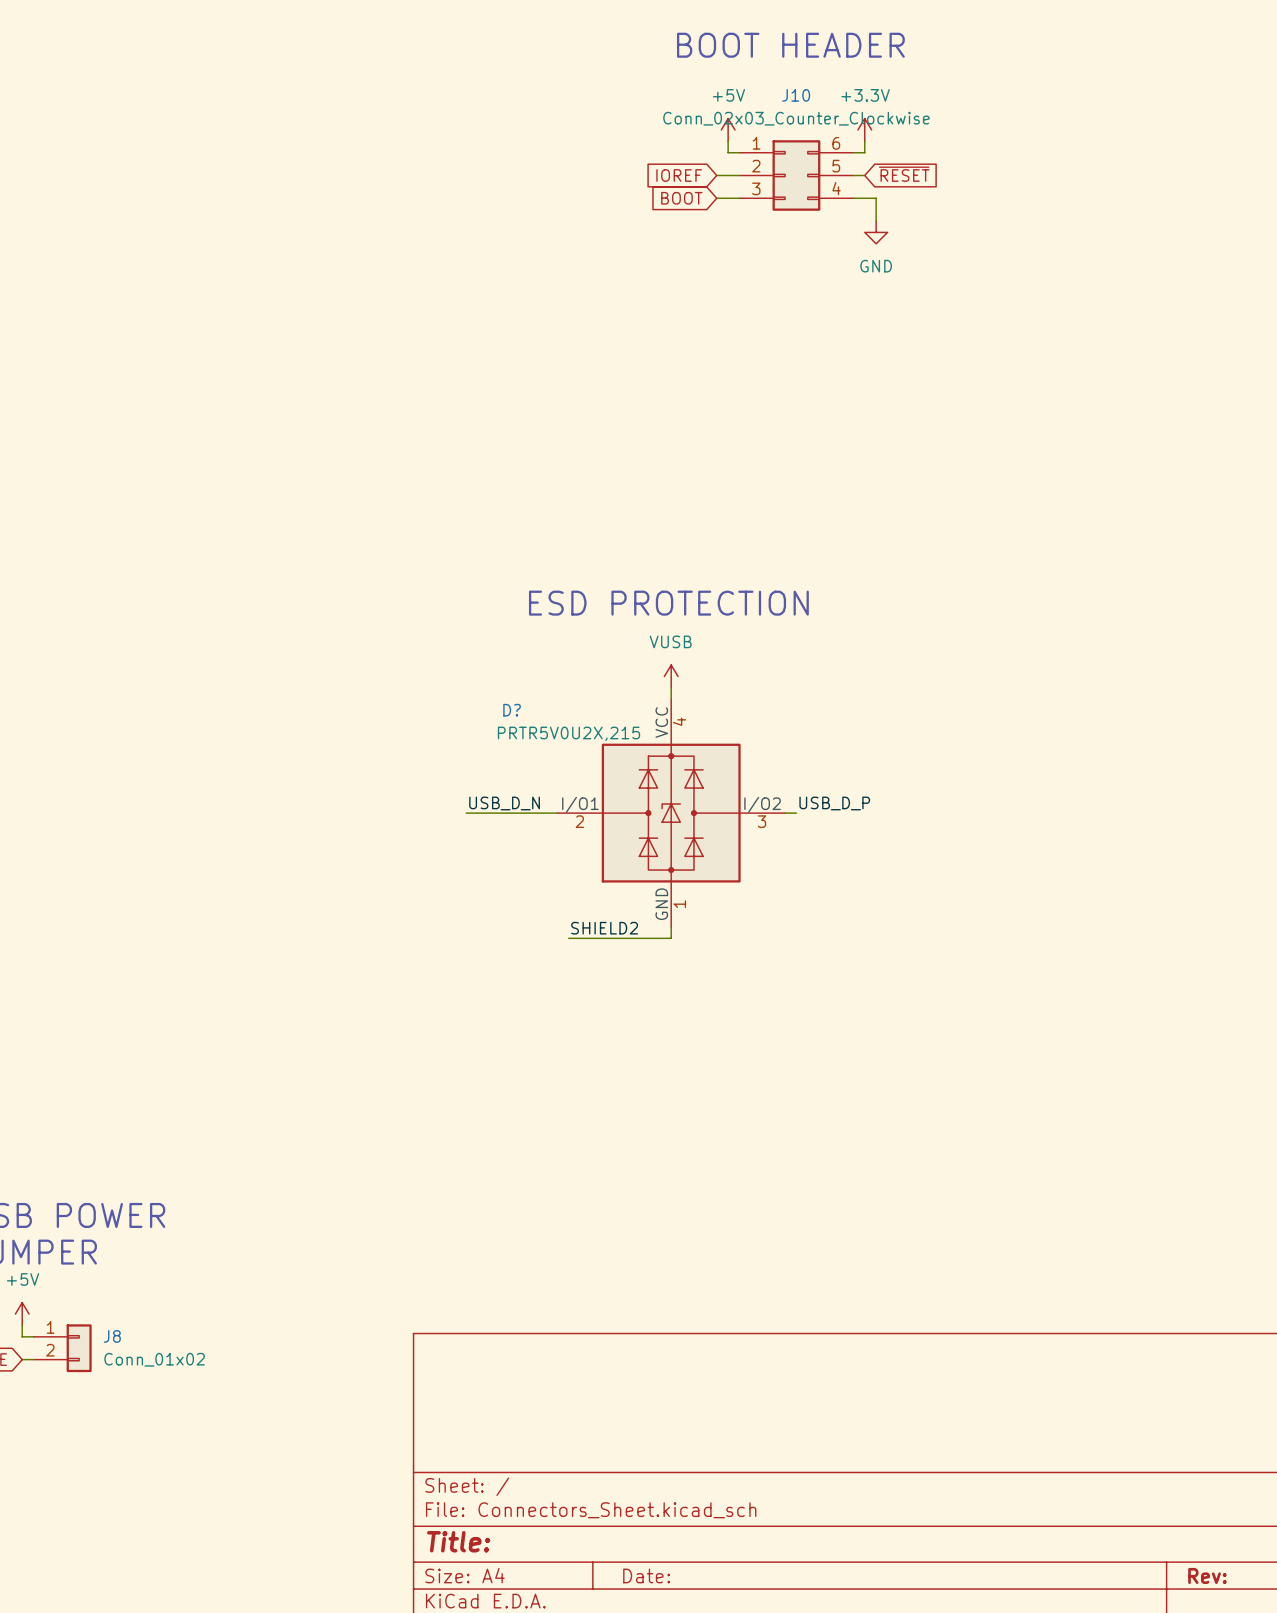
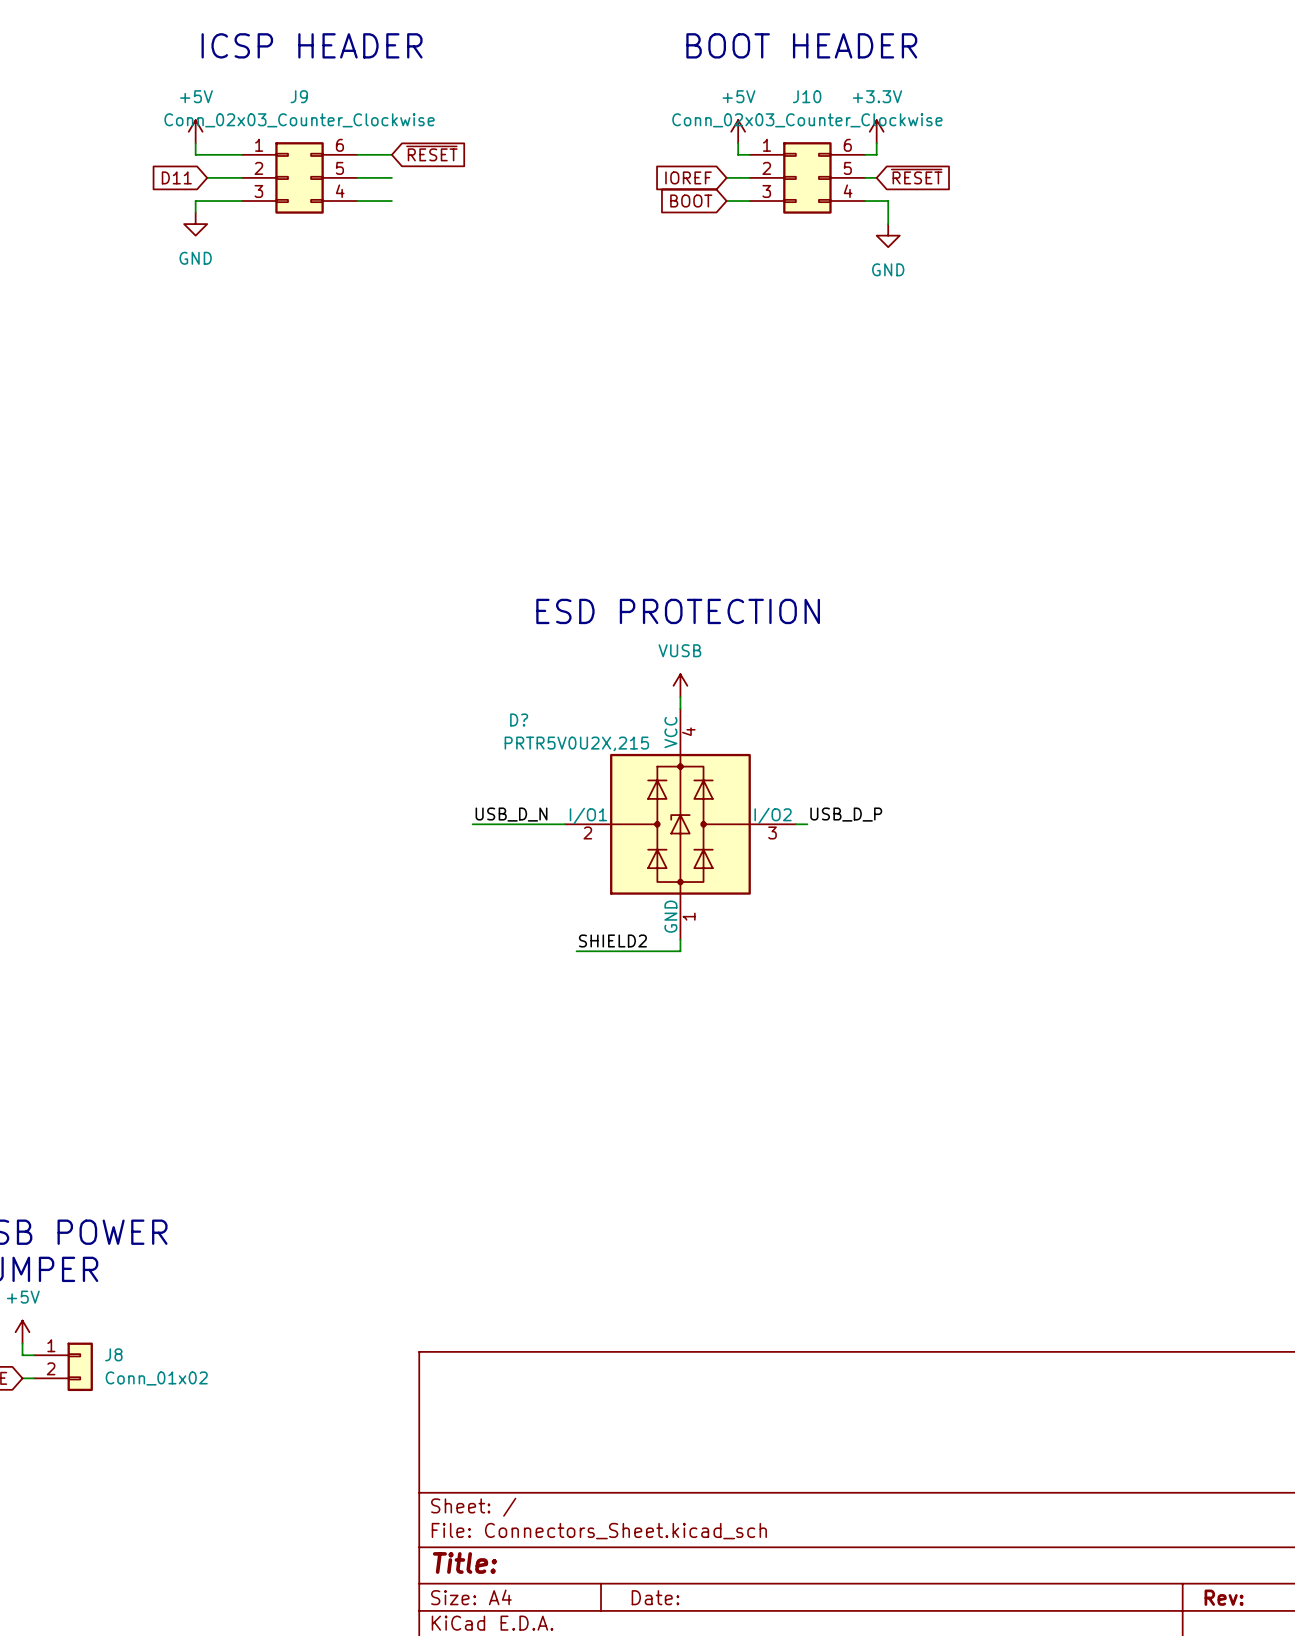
text: none -> ICSP HEADER (312, 45)
power symbol: none -> +5V (195, 131)
wire: none -> (195, 143) (195, 154) (241, 154)
global label: none -> ~{RESET} (431, 153)
wire: none -> (357, 154) (391, 154)
global label: none -> D11 (176, 177)
wire: none -> (207, 177) (241, 177)
J9: none -> Conn_02x03_Counter_Clockwise (299, 177)
wire: none -> (357, 177) (391, 177)
wire: none -> (241, 201) (195, 201) (195, 212)
wire: none -> (357, 201) (391, 201)
power symbol: none -> GND (195, 224)

